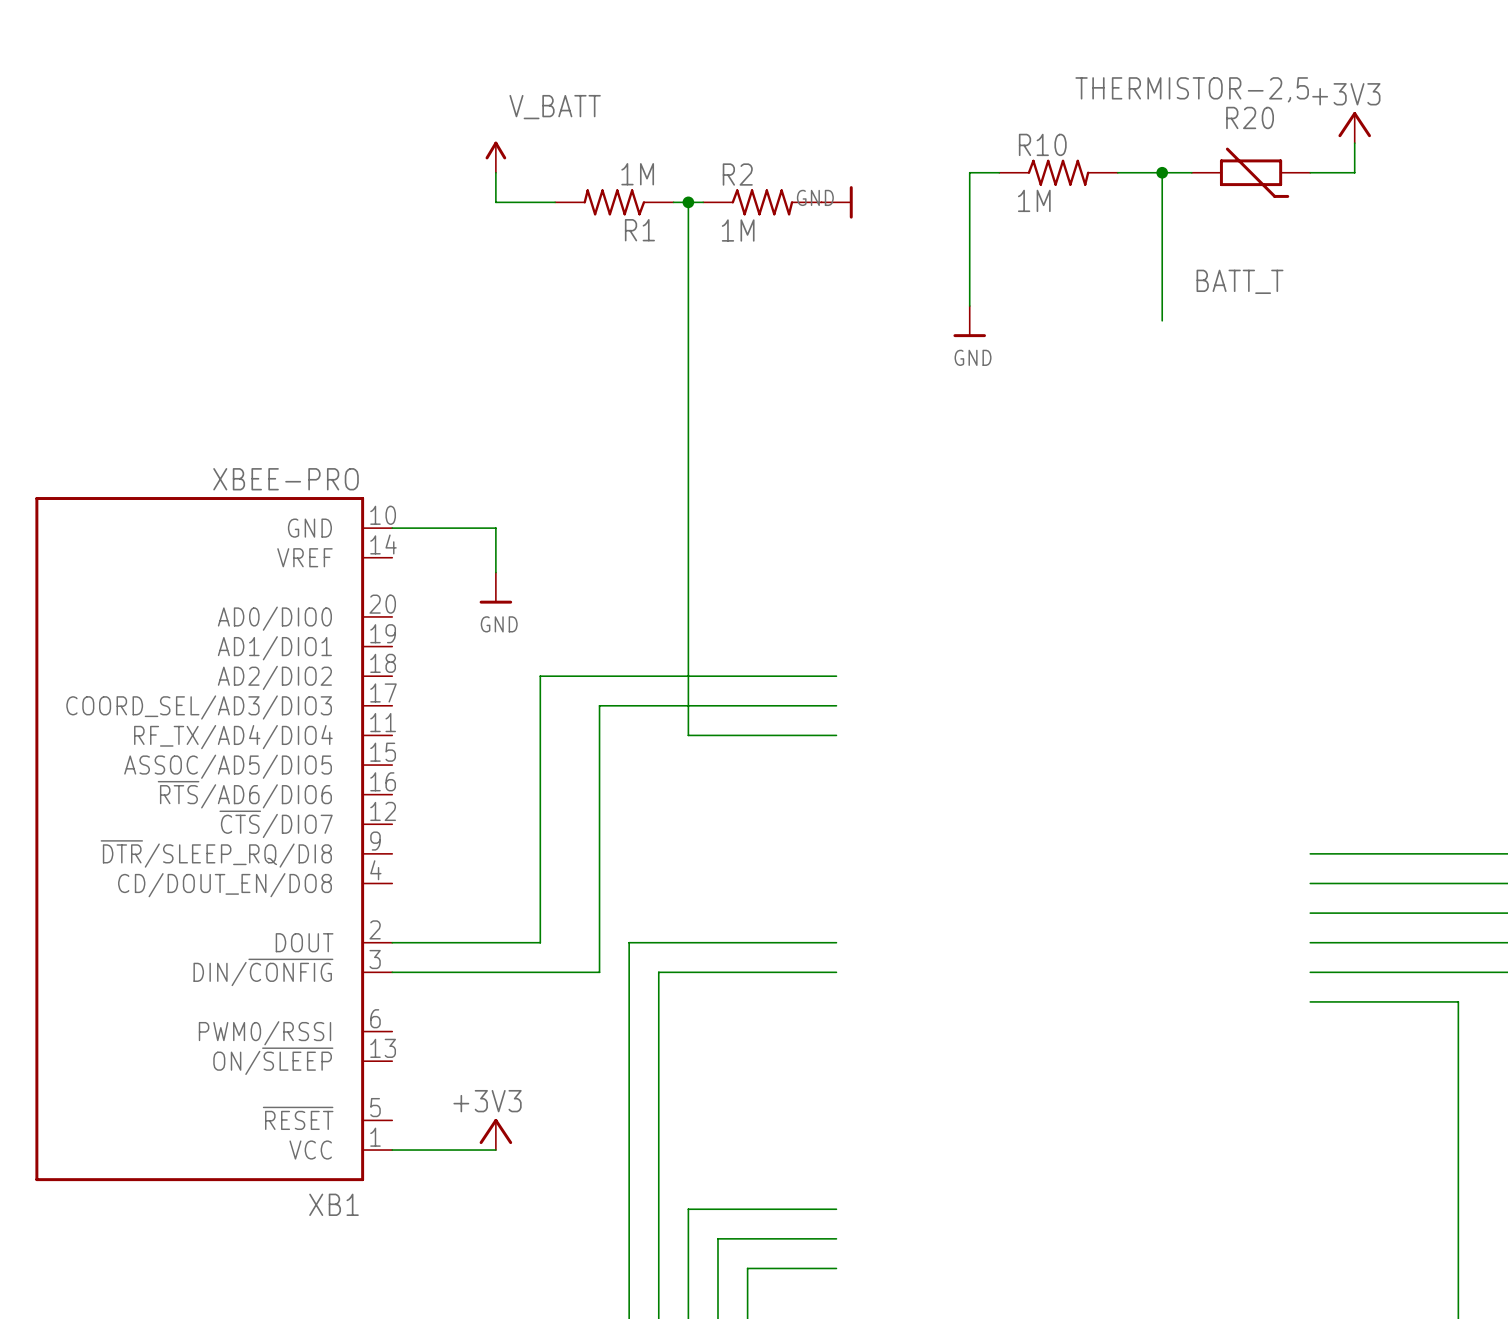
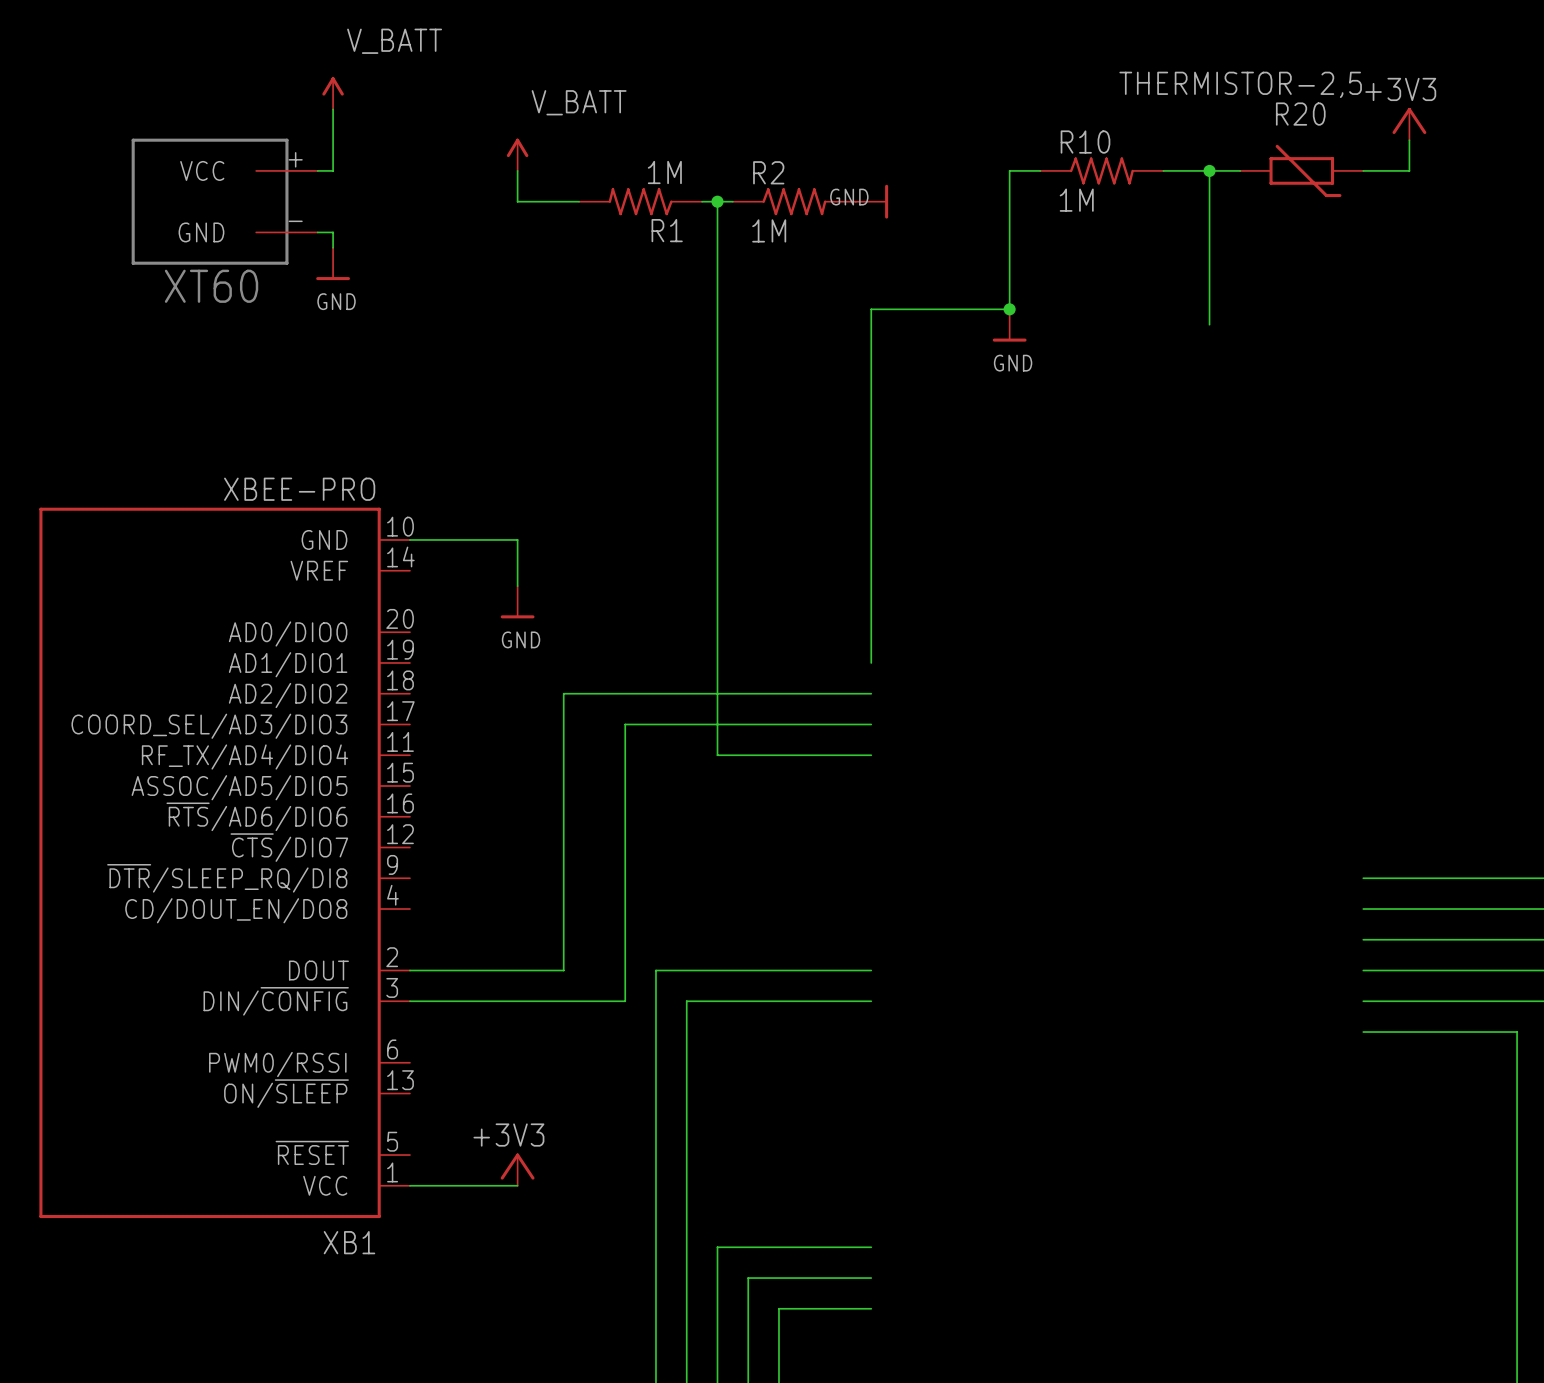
power symbol: none -> V_BATT (333, 93)
wire: none -> (333, 109) (333, 170) (317, 170)
part: none -> (224, 201)
wire: none -> (317, 232) (333, 232) (333, 247)
power symbol: none -> GND (333, 263)
label: BATT_T (1240, 281) -> none
wire: none -> (1009, 309) (871, 309) (871, 662)
junction: none -> (1009, 309)

